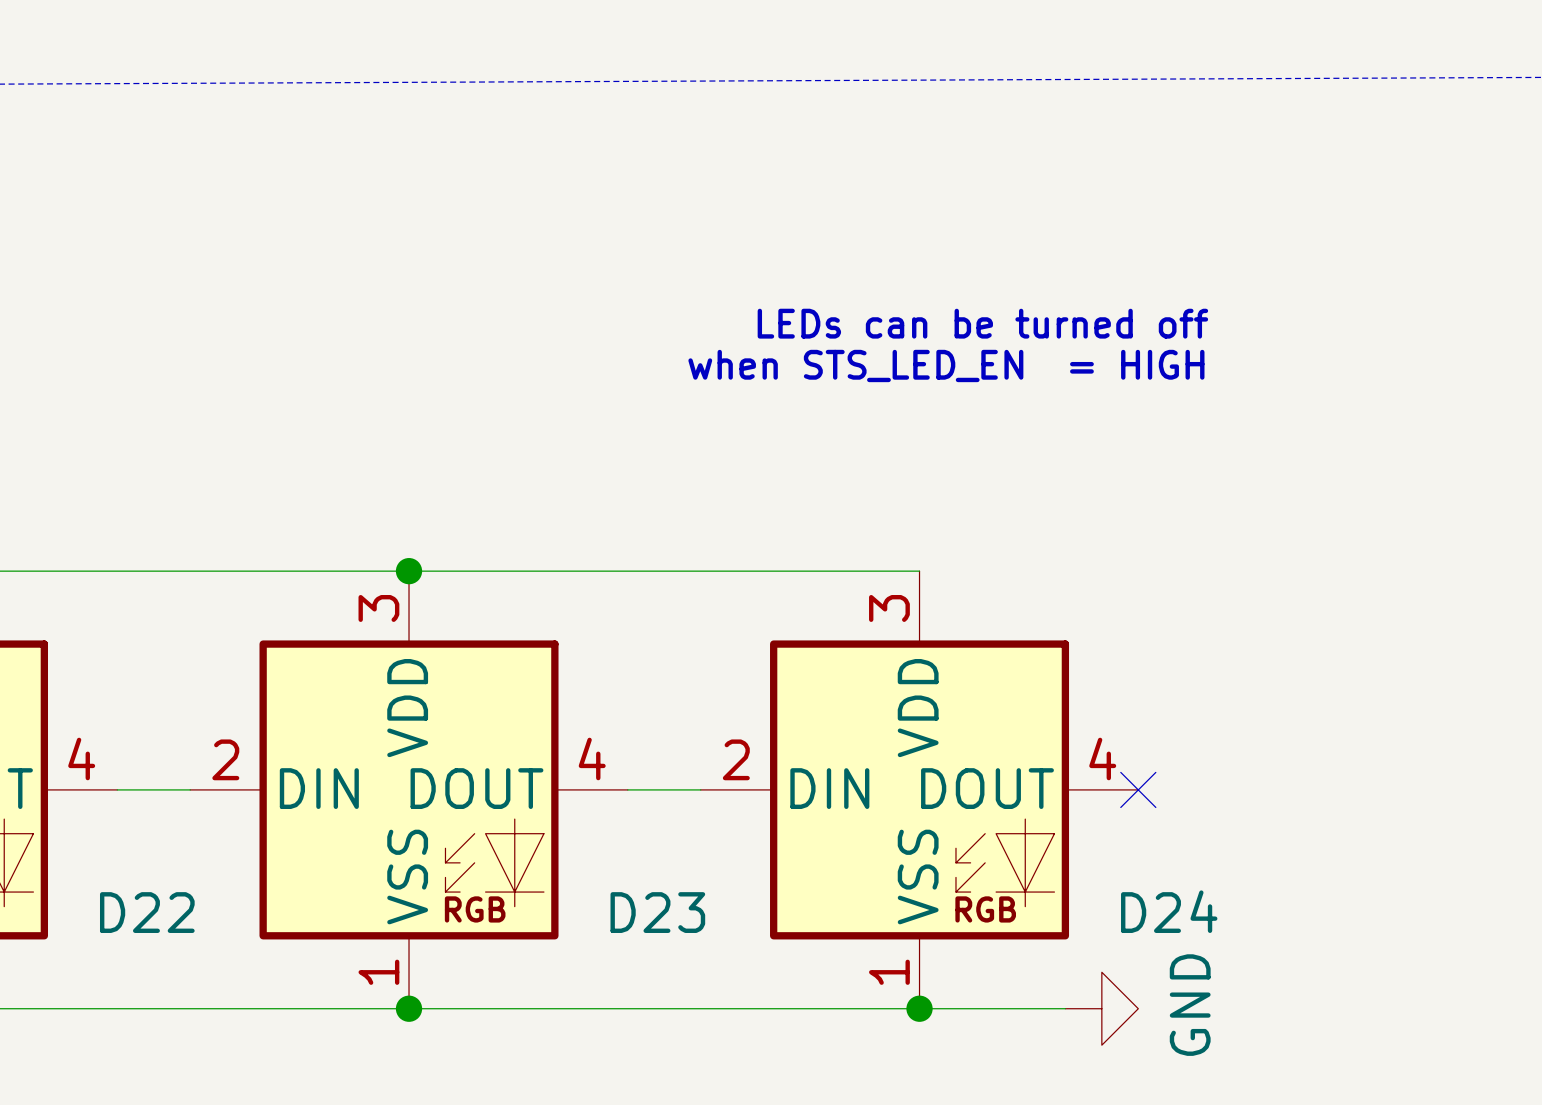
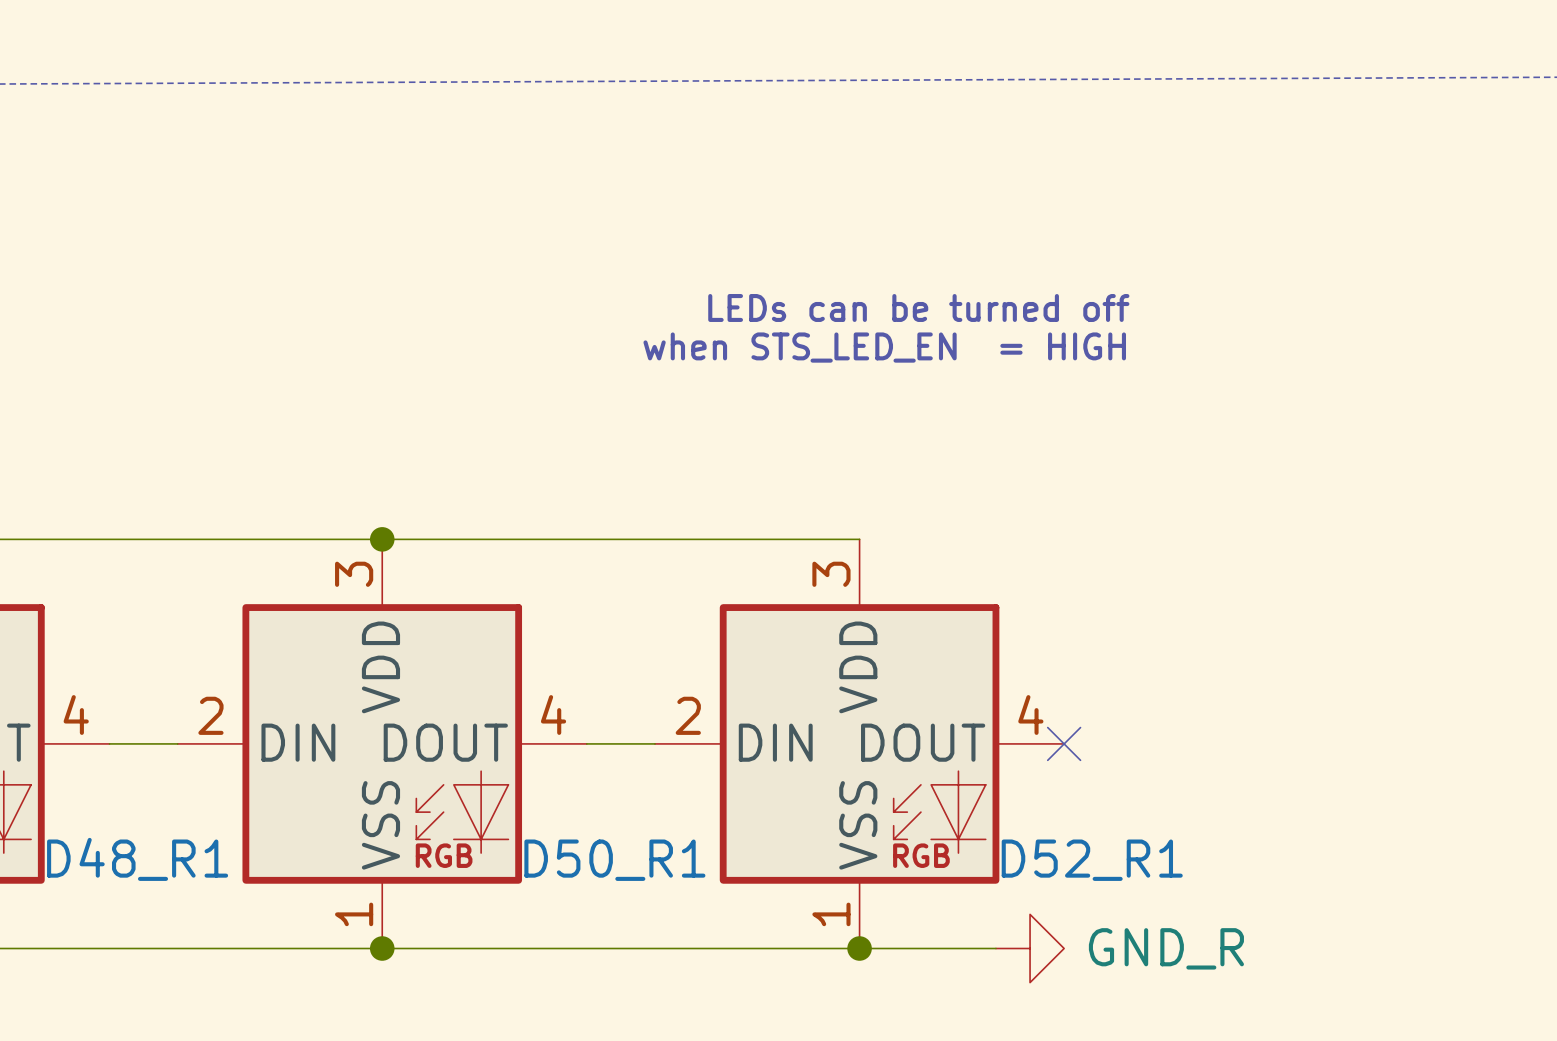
D24 name: D24 (1169, 911) -> D52_R1 (1092, 860)
D22 name: D22 (147, 912) -> D48_R1 (137, 859)
D23 name: D23 (657, 912) -> D50_R1 (614, 860)
power symbol: GND (1101, 1008) -> GND_R (1030, 948)

